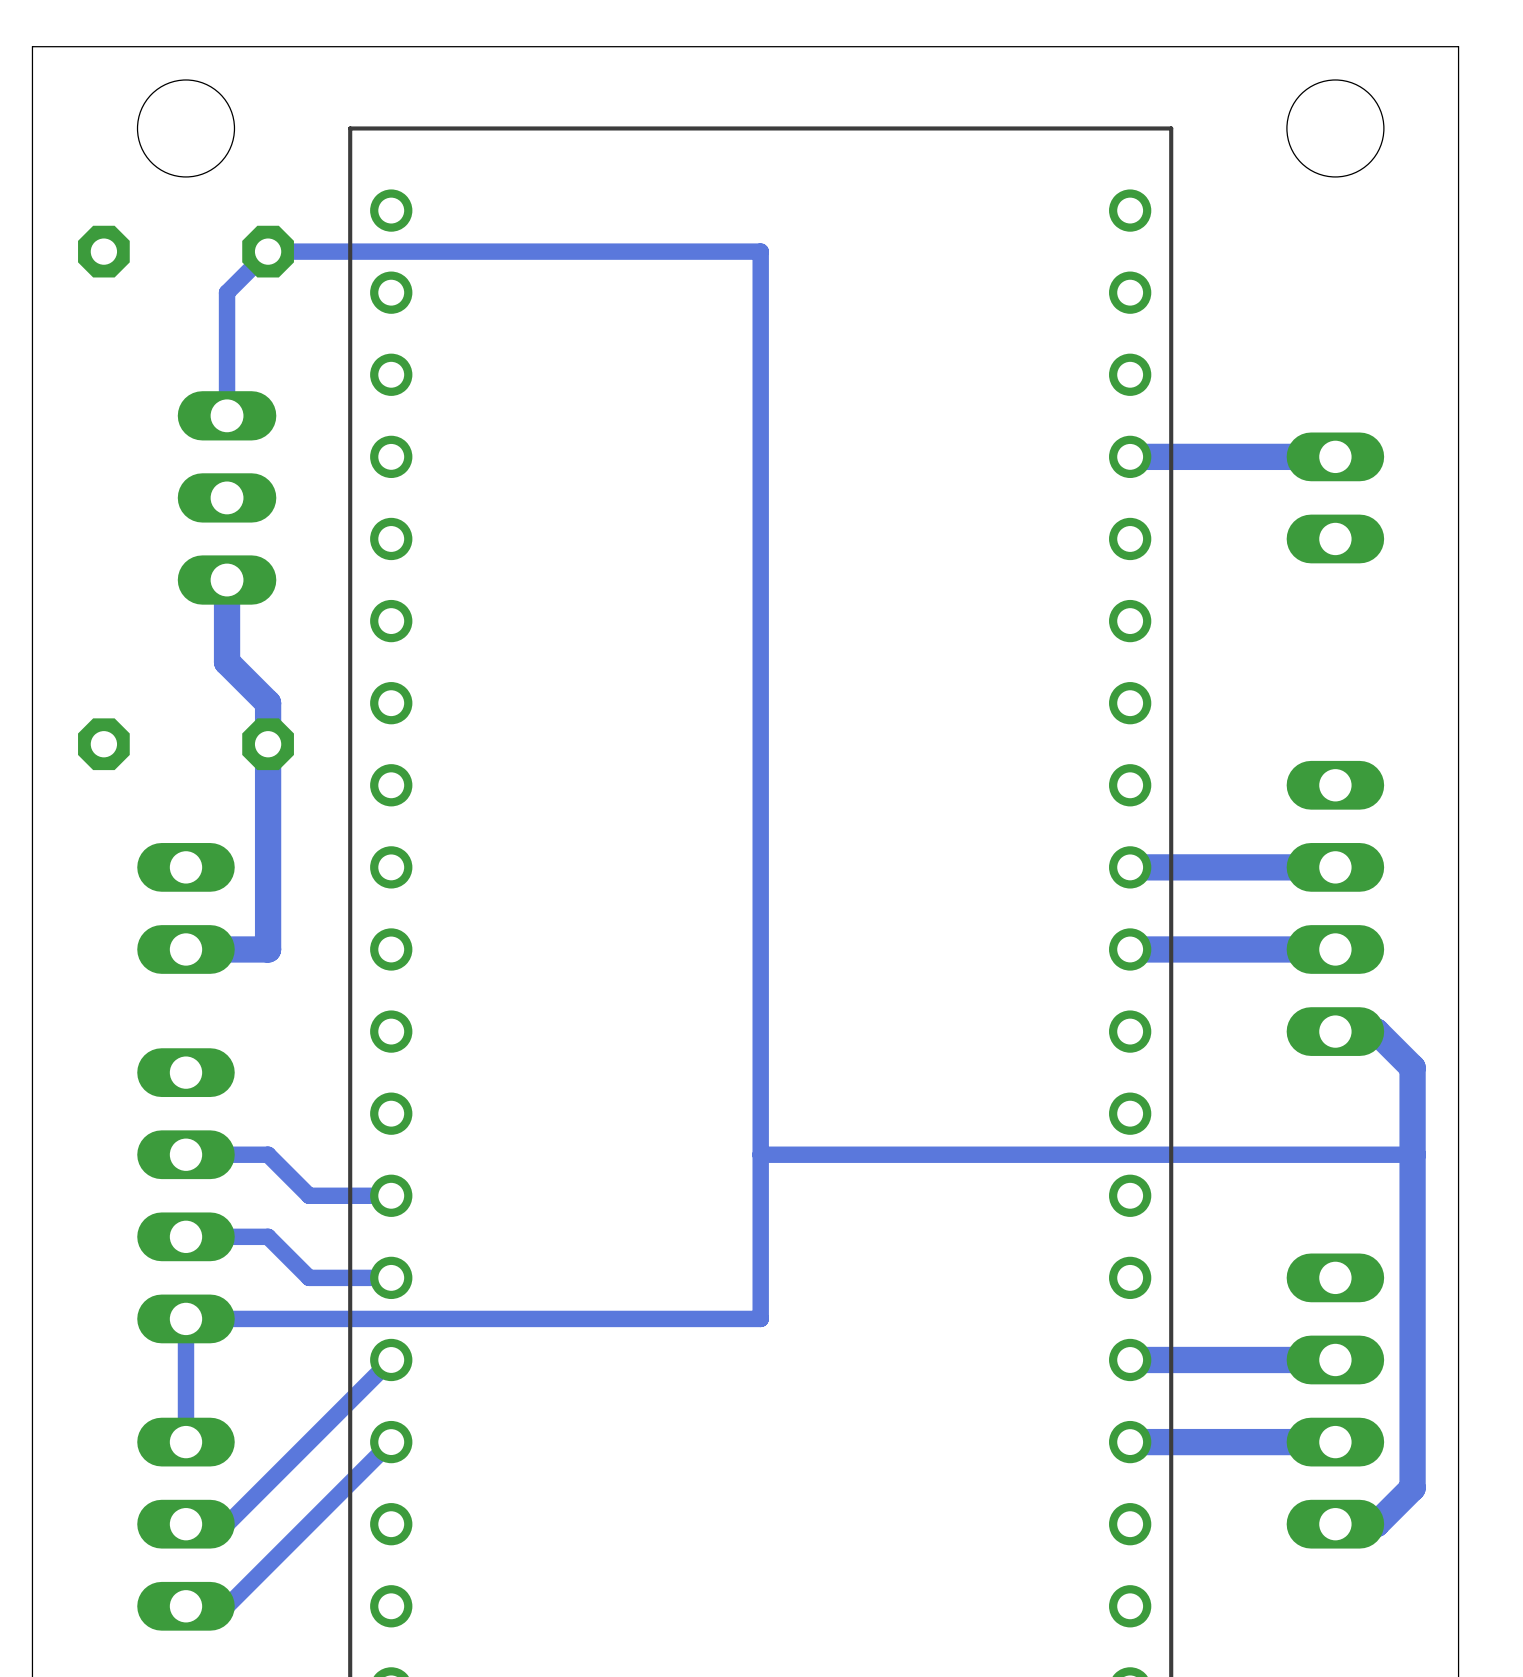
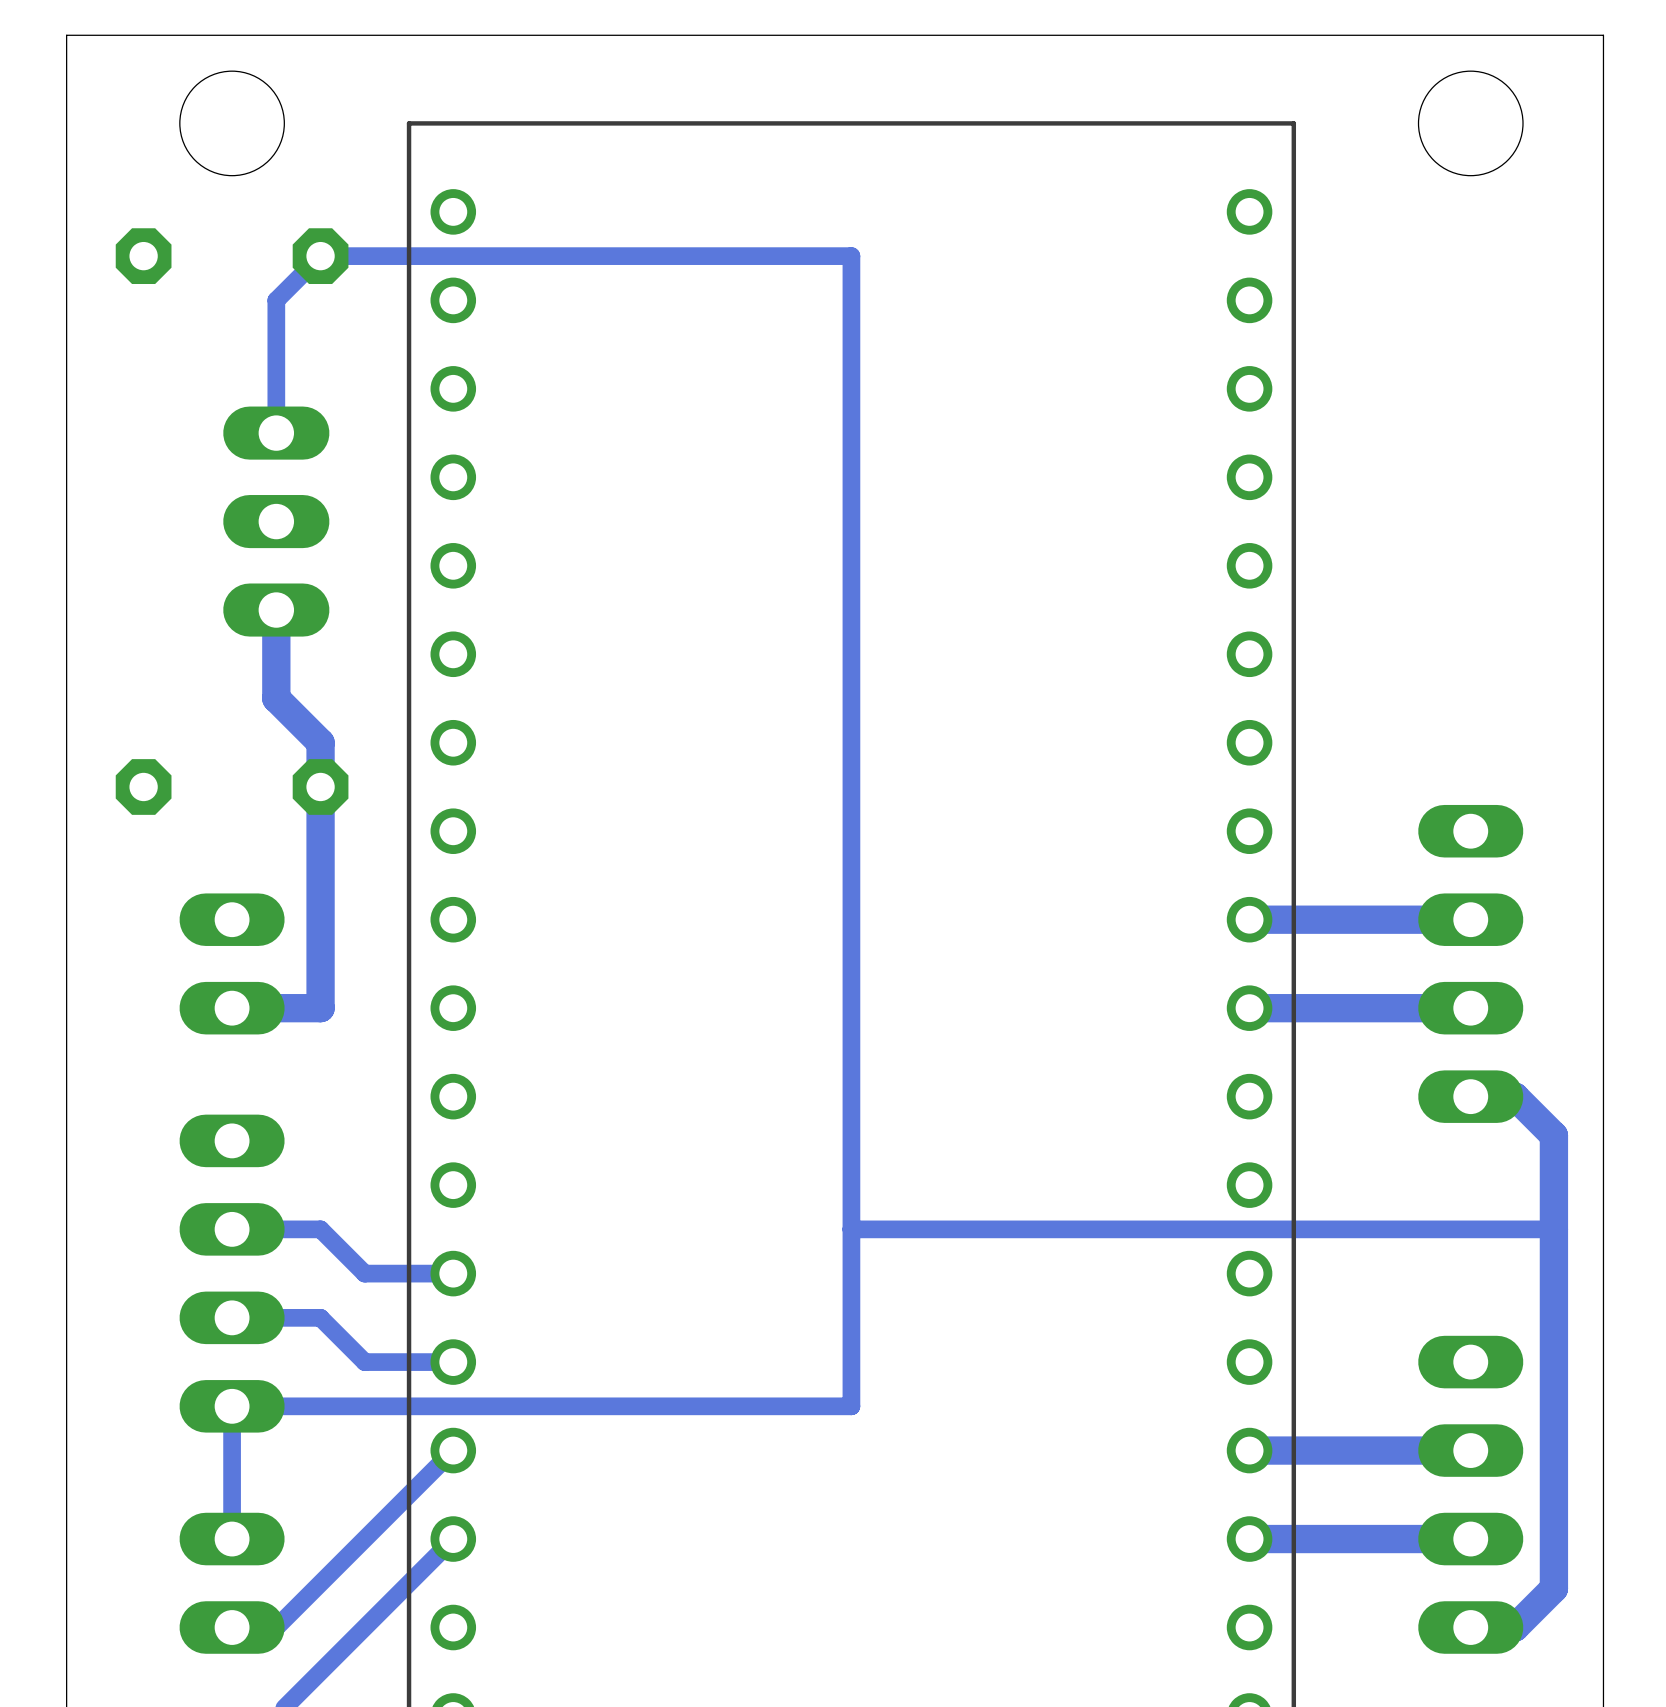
track: (1335, 456) (1130, 456) -> none
part: (1335, 497) -> none

